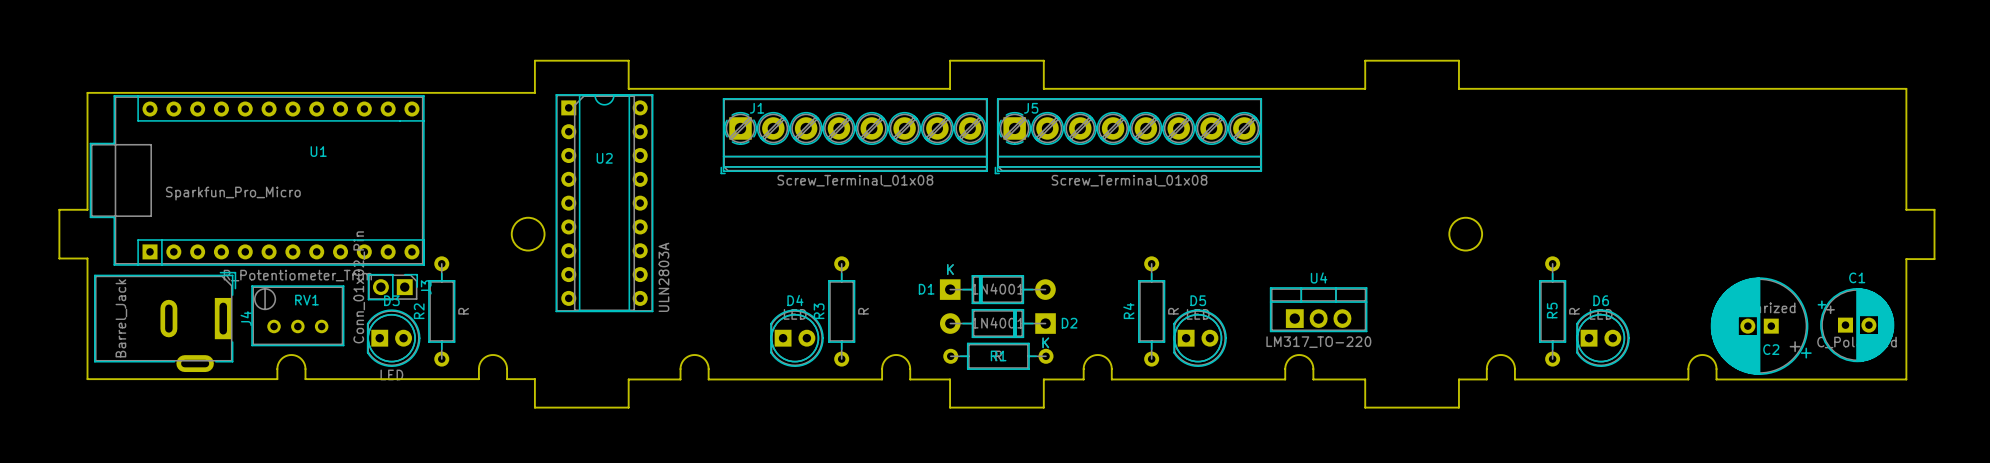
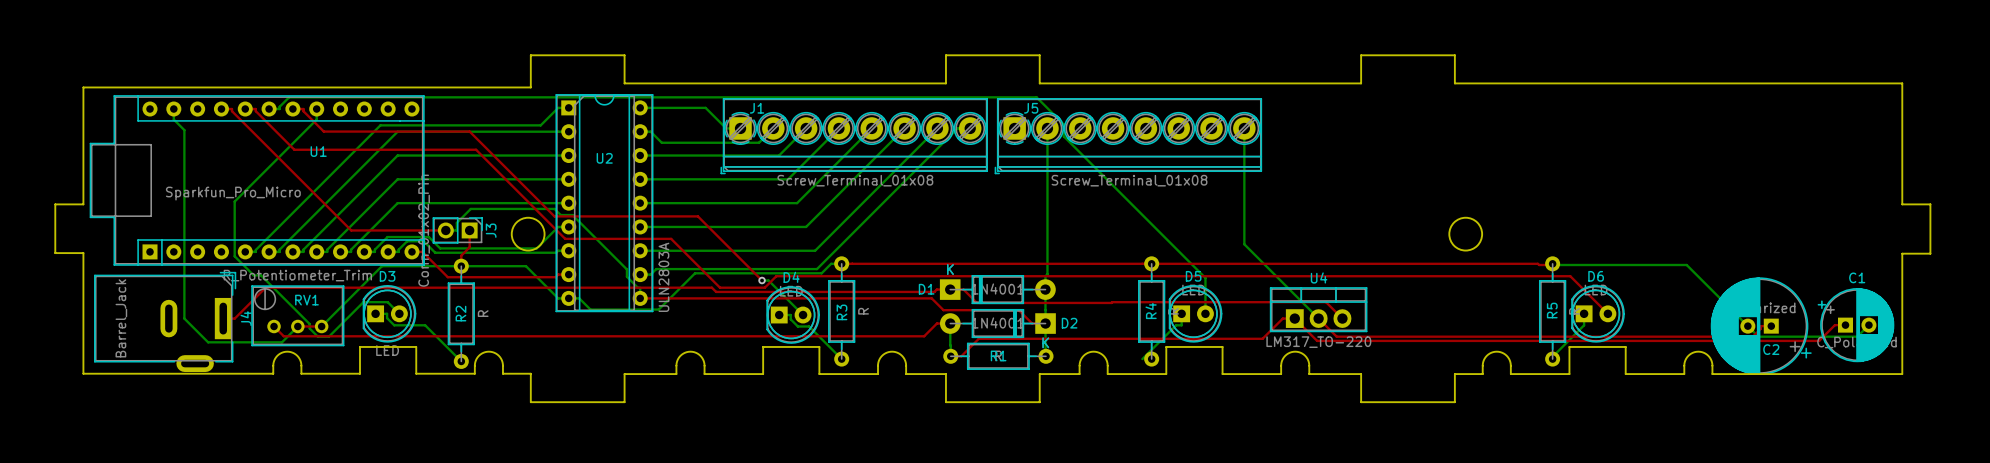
board edge: (534, 60) (628, 60) (628, 88) (950, 88) (950, 60) (1043, 60) (1043, 88) (1365, 88) (1365, 60) (1458, 60) (1458, 88) (1906, 88) (1906, 209) (1934, 209) (1934, 259) (1906, 259) (1906, 379) (1716, 379) (1714, 362) (1708, 356) (1702, 354) (1695, 356) (1690, 362) (1688, 379) (1514, 379) (1513, 362) (1507, 356) (1500, 354) (1494, 356) (1488, 362) (1486, 379) (1458, 379) (1458, 407) (1365, 407) (1365, 379) (1313, 379) (1311, 362) (1301, 355) (1292, 356) (1287, 362) (1285, 379) (1111, 379) (1109, 362) (1104, 356) (1097, 354) (1090, 356) (1085, 362) (1083, 379) (1043, 379) (1043, 407) (950, 407) (950, 379) (910, 379) (909, 363) (899, 355) (890, 356) (885, 360) (882, 367) (882, 379) (708, 379) (707, 362) (702, 357) (694, 354) (686, 357) (682, 362) (680, 379) (628, 379) (628, 407) (534, 407) (534, 379) (507, 379) (505, 362) (500, 356) (493, 354) (485, 356) (480, 362) (478, 379) (305, 379) (303, 362) (298, 356) (291, 354) (284, 356) (279, 362) (277, 379) (87, 379) (87, 258) (59, 258) (59, 209) (87, 209) (87, 92) (534, 92) (534, 60) -> (530, 55) (530, 87) (83, 87) (83, 204) (55, 204) (55, 253) (83, 253) (83, 373) (273, 373) (275, 358) (280, 353) (287, 351) (294, 353) (299, 358) (301, 373) (359, 373) (359, 346) (416, 346) (416, 373) (474, 373) (475, 362) (478, 355) (485, 352) (494, 352) (501, 360) (502, 373) (530, 373) (530, 402) (624, 402) (624, 374) (676, 374) (678, 358) (688, 351) (695, 352) (701, 357) (704, 363) (704, 374) (763, 374) (763, 346) (819, 346) (819, 374) (878, 374) (878, 362) (881, 356) (887, 352) (895, 352) (904, 359) (906, 374) (945, 374) (945, 402) (1039, 402) (1039, 374) (1079, 374) (1081, 358) (1091, 351) (1099, 352) (1104, 357) (1107, 363) (1107, 374) (1166, 374) (1166, 346) (1222, 346) (1222, 374) (1281, 374) (1281, 363) (1284, 357) (1291, 352) (1298, 352) (1308, 360) (1309, 374) (1361, 374) (1361, 402) (1454, 402) (1454, 374) (1482, 374) (1484, 358) (1494, 351) (1502, 352) (1507, 357) (1510, 363) (1510, 374) (1569, 374) (1569, 346) (1625, 346) (1625, 374) (1684, 374) (1686, 358) (1691, 353) (1698, 351) (1705, 353) (1710, 358) (1712, 374) (1902, 374) (1902, 253) (1930, 253) (1930, 204) (1902, 204) (1902, 83) (1454, 83) (1454, 55) (1361, 55) (1361, 83) (1039, 83) (1039, 55) (945, 55) (945, 83) (624, 83) (624, 55) (530, 55)
bottom track: none -> (568, 107) (558, 107) (540, 125) (380, 125) (255, 251) (245, 251)
bottom track: none -> (640, 107) (705, 107) (726, 128) (740, 128)
bottom track: none -> (173, 109) (173, 119) (184, 130) (184, 318) (208, 342) (282, 342) (297, 326)
top track: none -> (221, 109) (232, 109) (232, 111) (351, 230) (445, 230)
top track: none -> (245, 109) (255, 109) (255, 111) (294, 149) (476, 149) (565, 238) (671, 238) (719, 287) (764, 287) (776, 276) (1570, 276) (1607, 313)
bottom track: none -> (269, 109) (279, 109) (289, 97) (1036, 97) (1063, 124) (1063, 136) (1205, 278) (1205, 313)
top track: none -> (292, 109) (303, 109) (323, 131) (469, 131) (554, 216) (697, 216) (762, 280)
bottom track: none -> (316, 109) (316, 119) (234, 201) (234, 256) (253, 275) (261, 275) (309, 324) (309, 328) (317, 336) (328, 336) (363, 302) (387, 302) (399, 313)
bottom track: none -> (773, 128) (759, 142) (661, 142) (650, 131) (640, 131)
bottom track: none -> (806, 128) (779, 155) (640, 155)
bottom track: none -> (838, 128) (788, 179) (640, 179)
bottom track: none -> (871, 128) (797, 203) (640, 203)
bottom track: none -> (904, 128) (806, 226) (640, 226)
bottom track: none -> (937, 128) (815, 250) (640, 250)
bottom track: none -> (970, 128) (957, 128) (817, 269) (656, 269) (650, 274) (640, 274)
bottom track: none -> (1047, 128) (1046, 356)
bottom track: none -> (1244, 128) (1244, 244) (1318, 318)
bottom track: none -> (568, 131) (397, 131) (279, 249) (279, 251) (269, 251)
bottom track: none -> (568, 155) (397, 155) (303, 249) (303, 251) (292, 251)
bottom track: none -> (568, 179) (397, 179) (327, 249) (327, 251) (316, 251)
bottom track: none -> (568, 203) (397, 203) (351, 249) (351, 251) (340, 251)
bottom track: none -> (568, 226) (558, 226) (536, 248) (440, 248) (428, 237) (387, 237) (374, 251) (364, 251)
bottom track: none -> (445, 230) (456, 230) (456, 222) (470, 208) (554, 208) (560, 215) (572, 215) (626, 269) (626, 276) (640, 287) (640, 298)
top track: none -> (469, 230) (469, 247) (461, 255) (461, 266)
bottom track: none -> (568, 250) (558, 250) (556, 252) (435, 252) (423, 241) (407, 241) (398, 251) (388, 251)
top track: none -> (411, 251) (422, 251) (447, 277) (555, 277) (558, 274) (568, 274)
top track: none -> (841, 263) (1549, 265)
bottom track: none -> (841, 263) (831, 263) (821, 273) (695, 273) (658, 309) (590, 309) (579, 298) (558, 298) (525, 266) (381, 266) (321, 326)
bottom track: none -> (1549, 265) (1686, 265) (1758, 336) (1857, 336) (1868, 325)
bottom track: none -> (762, 280) (768, 280) (803, 315)
via: none -> (762, 280)
J3 position: (392, 287) -> (457, 230)
top track: none -> (640, 298) (931, 298) (943, 310) (1018, 310) (1032, 323) (1045, 323)
R2 name position: R2 (419, 311) -> R2 (460, 313)
R2 position: (441, 311) -> (461, 313)
R3 name position: R3 (819, 311) -> R3 (841, 312)
R4 name position: R4 (1128, 311) -> R4 (1151, 311)
bottom track: none -> (375, 313) (387, 313) (387, 318) (394, 325) (425, 325) (461, 361)
bottom track: none -> (1181, 313) (1181, 325) (1176, 325) (1142, 359)
bottom track: none -> (1584, 313) (1584, 325) (1549, 360)
bottom track: none -> (779, 315) (790, 315) (790, 319) (797, 326) (809, 326) (841, 359)
top track: none -> (223, 318) (234, 318) (265, 287) (711, 287) (716, 291) (934, 291) (936, 289) (963, 289) (976, 302) (1326, 302) (1342, 318)
top track: none -> (1318, 318) (1336, 336) (1752, 336) (1760, 328) (1760, 326) (1771, 326)
top track: none -> (950, 323) (936, 323) (924, 336) (283, 336) (274, 326)
bottom track: none -> (950, 323) (950, 356)
top track: none -> (1845, 325) (1834, 325) (1819, 340) (1317, 340) (1294, 318) (1282, 318) (1262, 338) (978, 338) (961, 356) (950, 356)
top track: none -> (297, 326) (321, 326)
D3 position: (393, 338) -> (389, 313)
D4 position: (797, 338) -> (793, 315)
D5 position: (1200, 338) -> (1195, 313)
D6 position: (1602, 338) -> (1598, 313)

